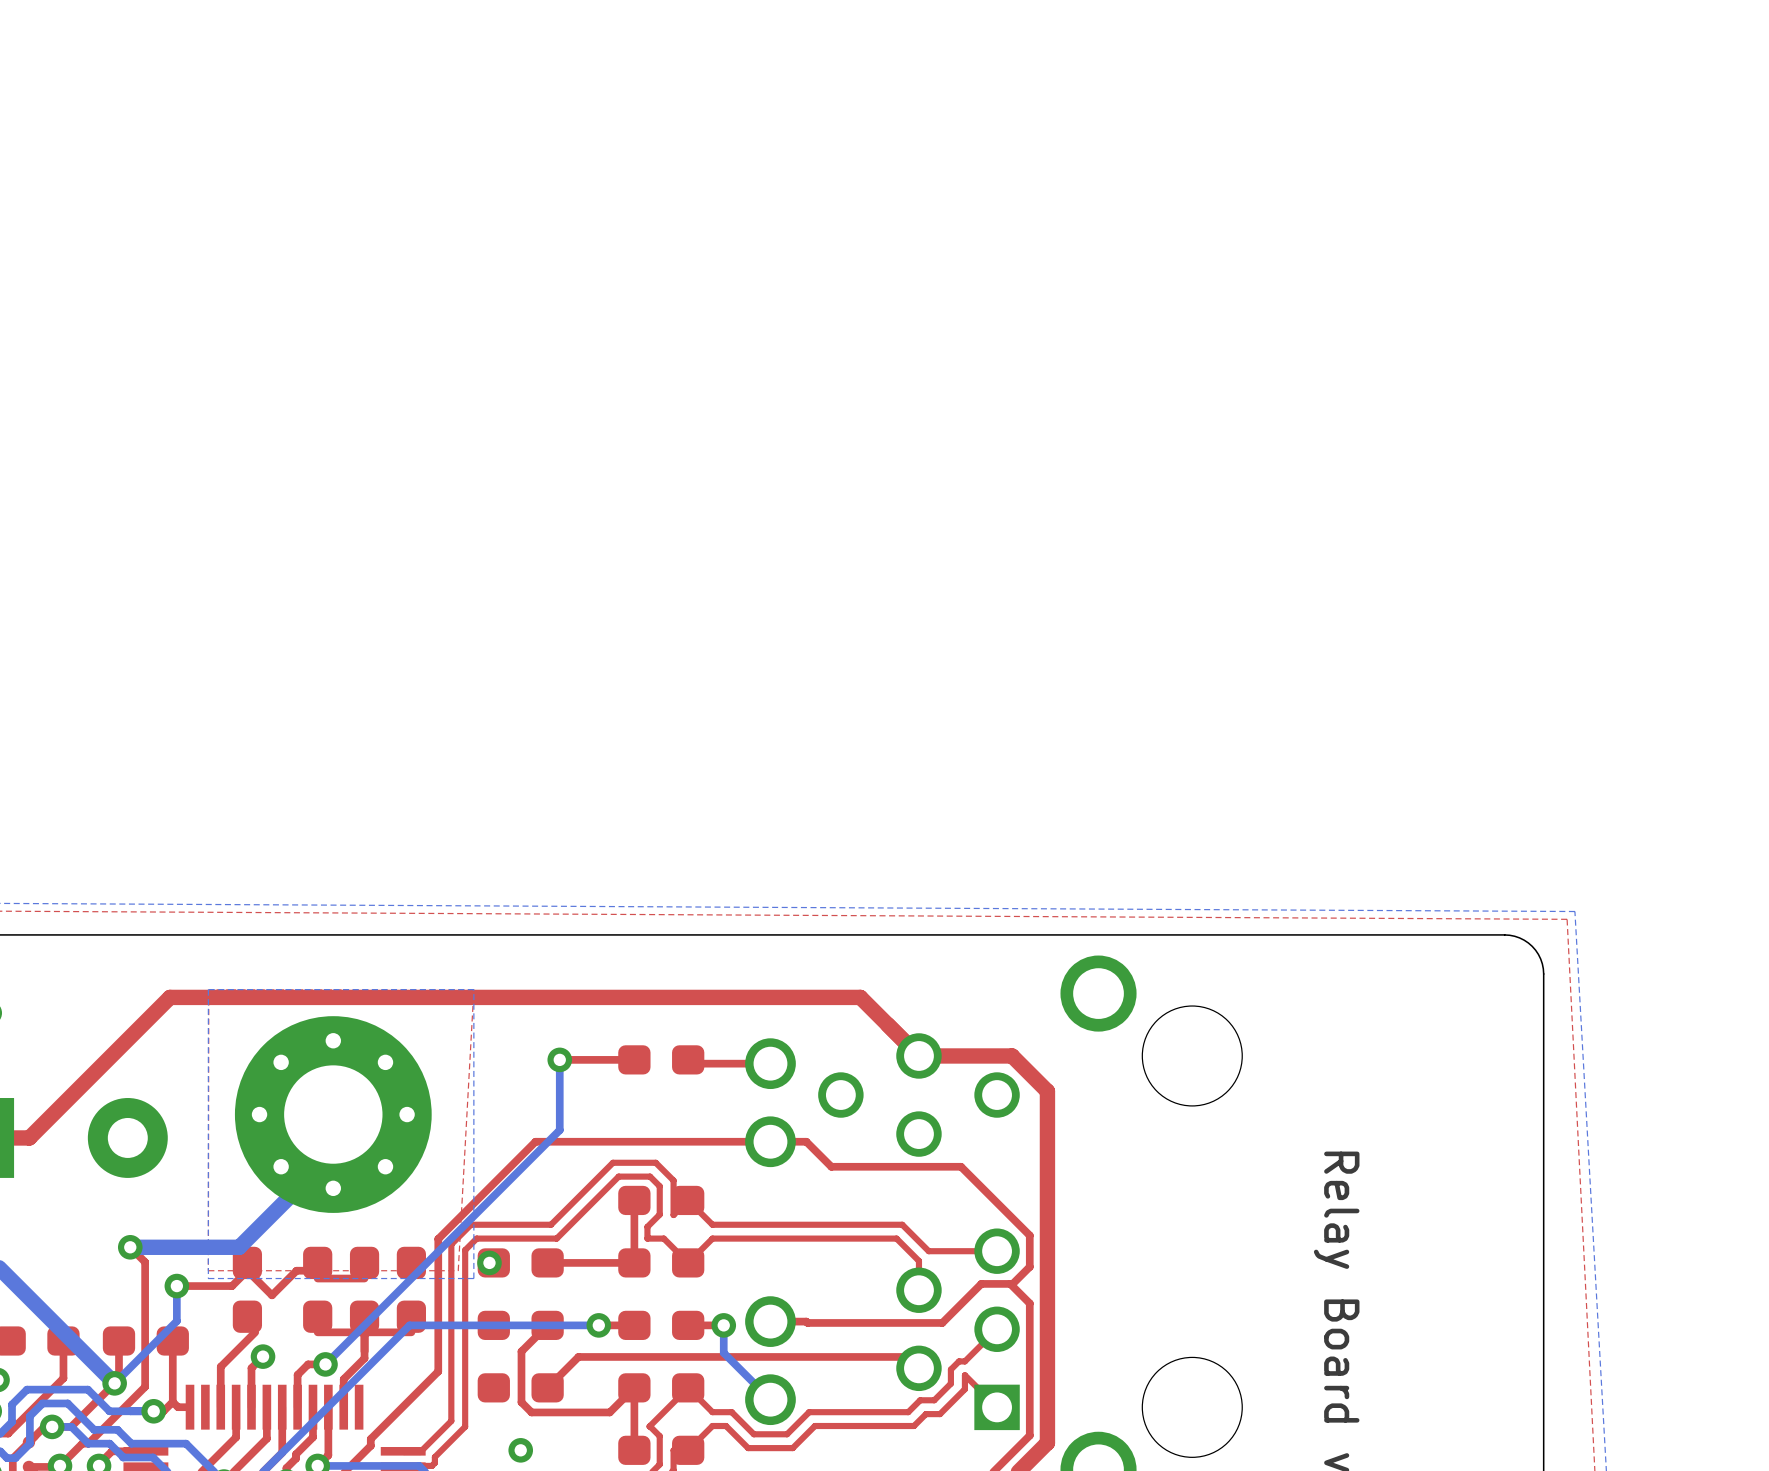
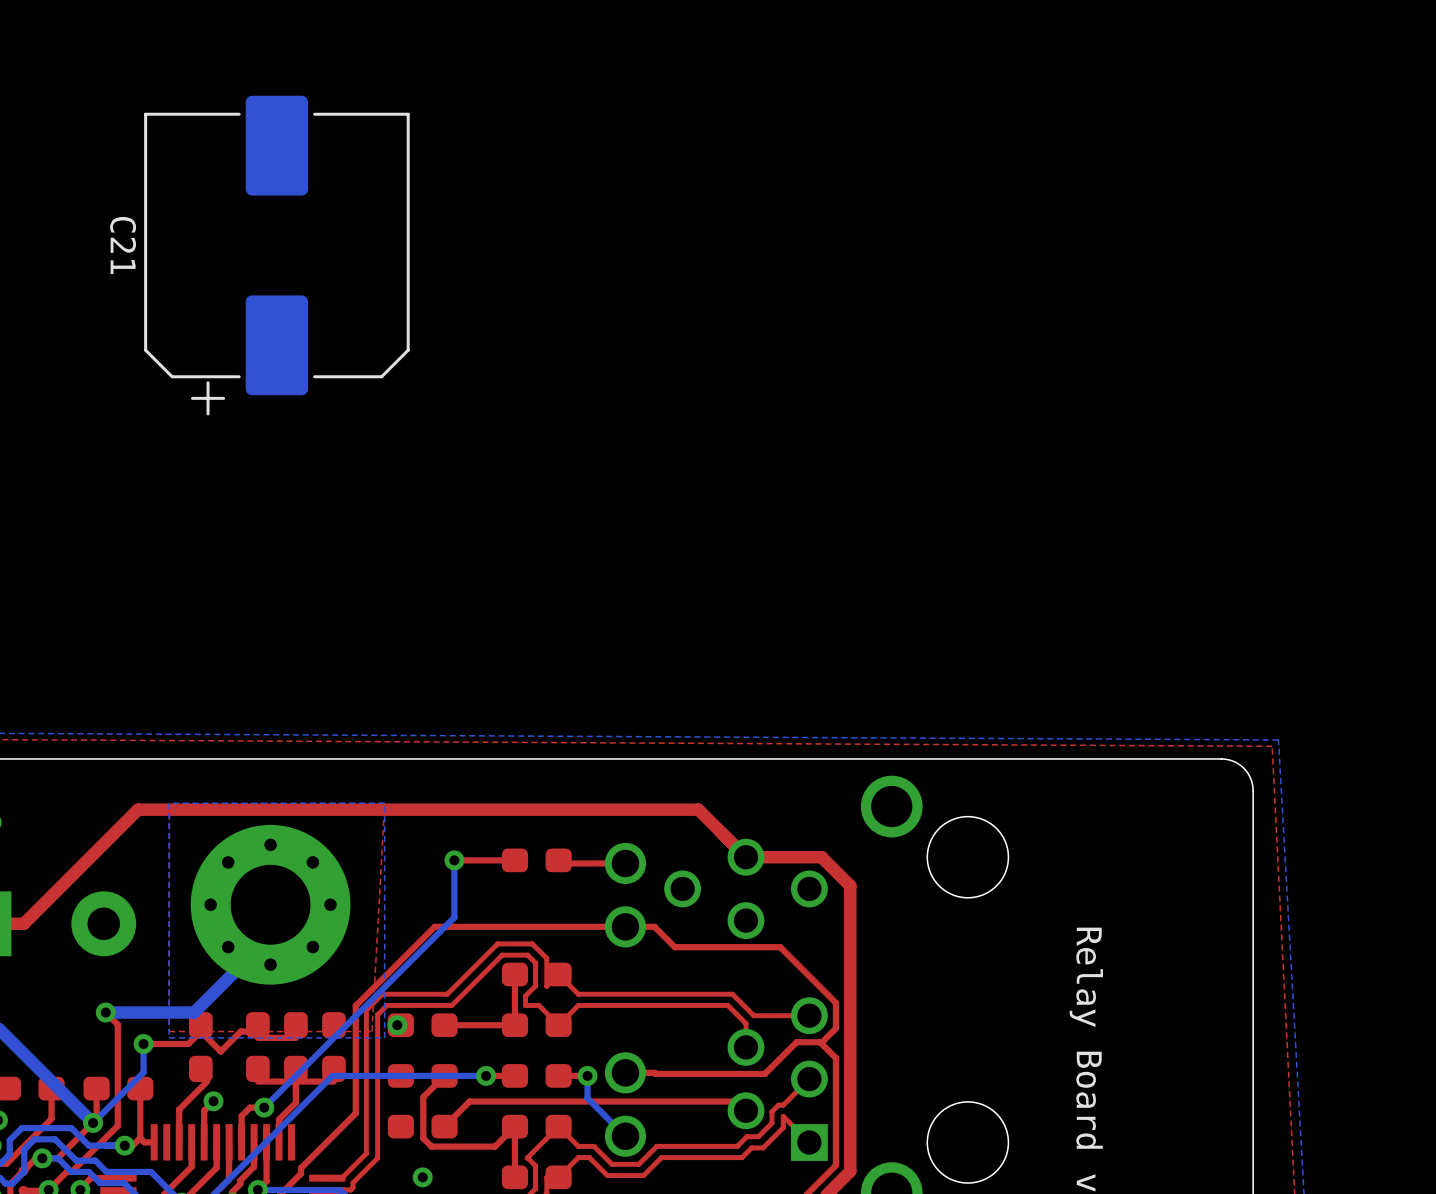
C21: none -> (276, 255)

